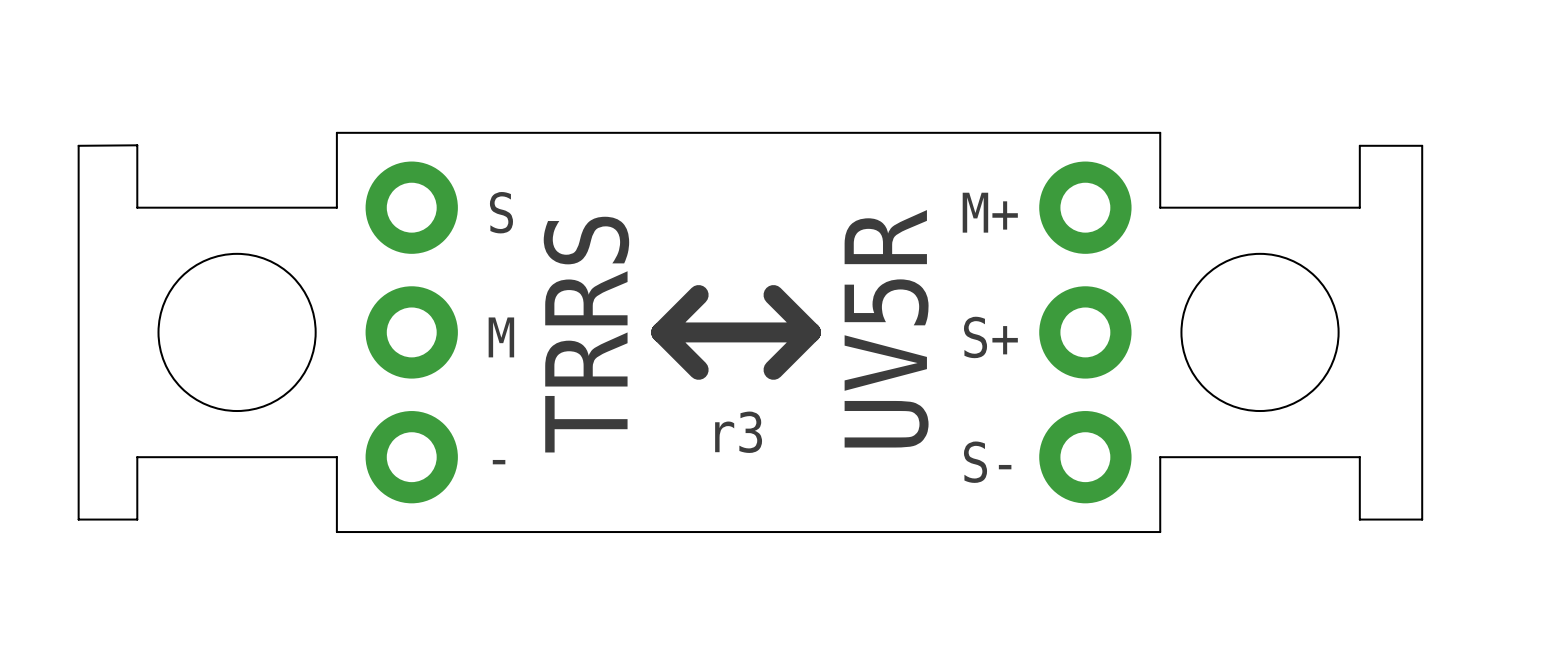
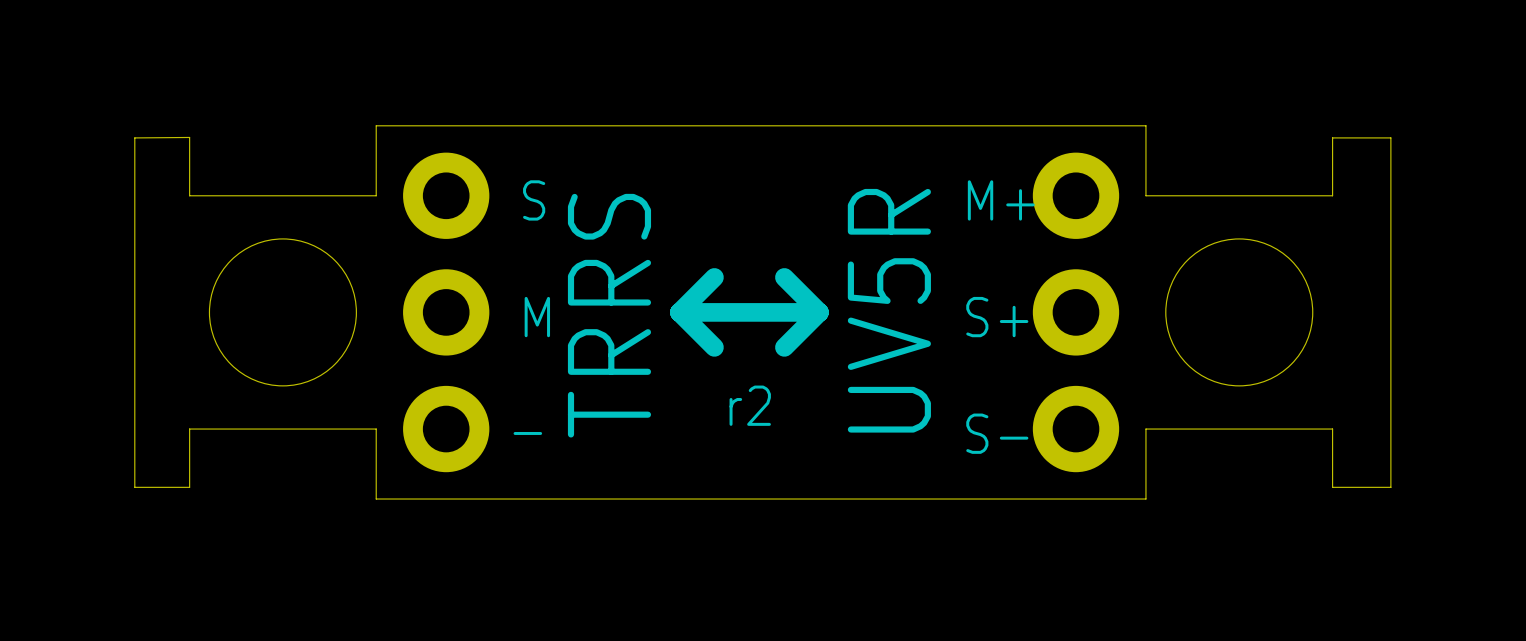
text: r3 (738, 432) -> r2 (750, 405)

